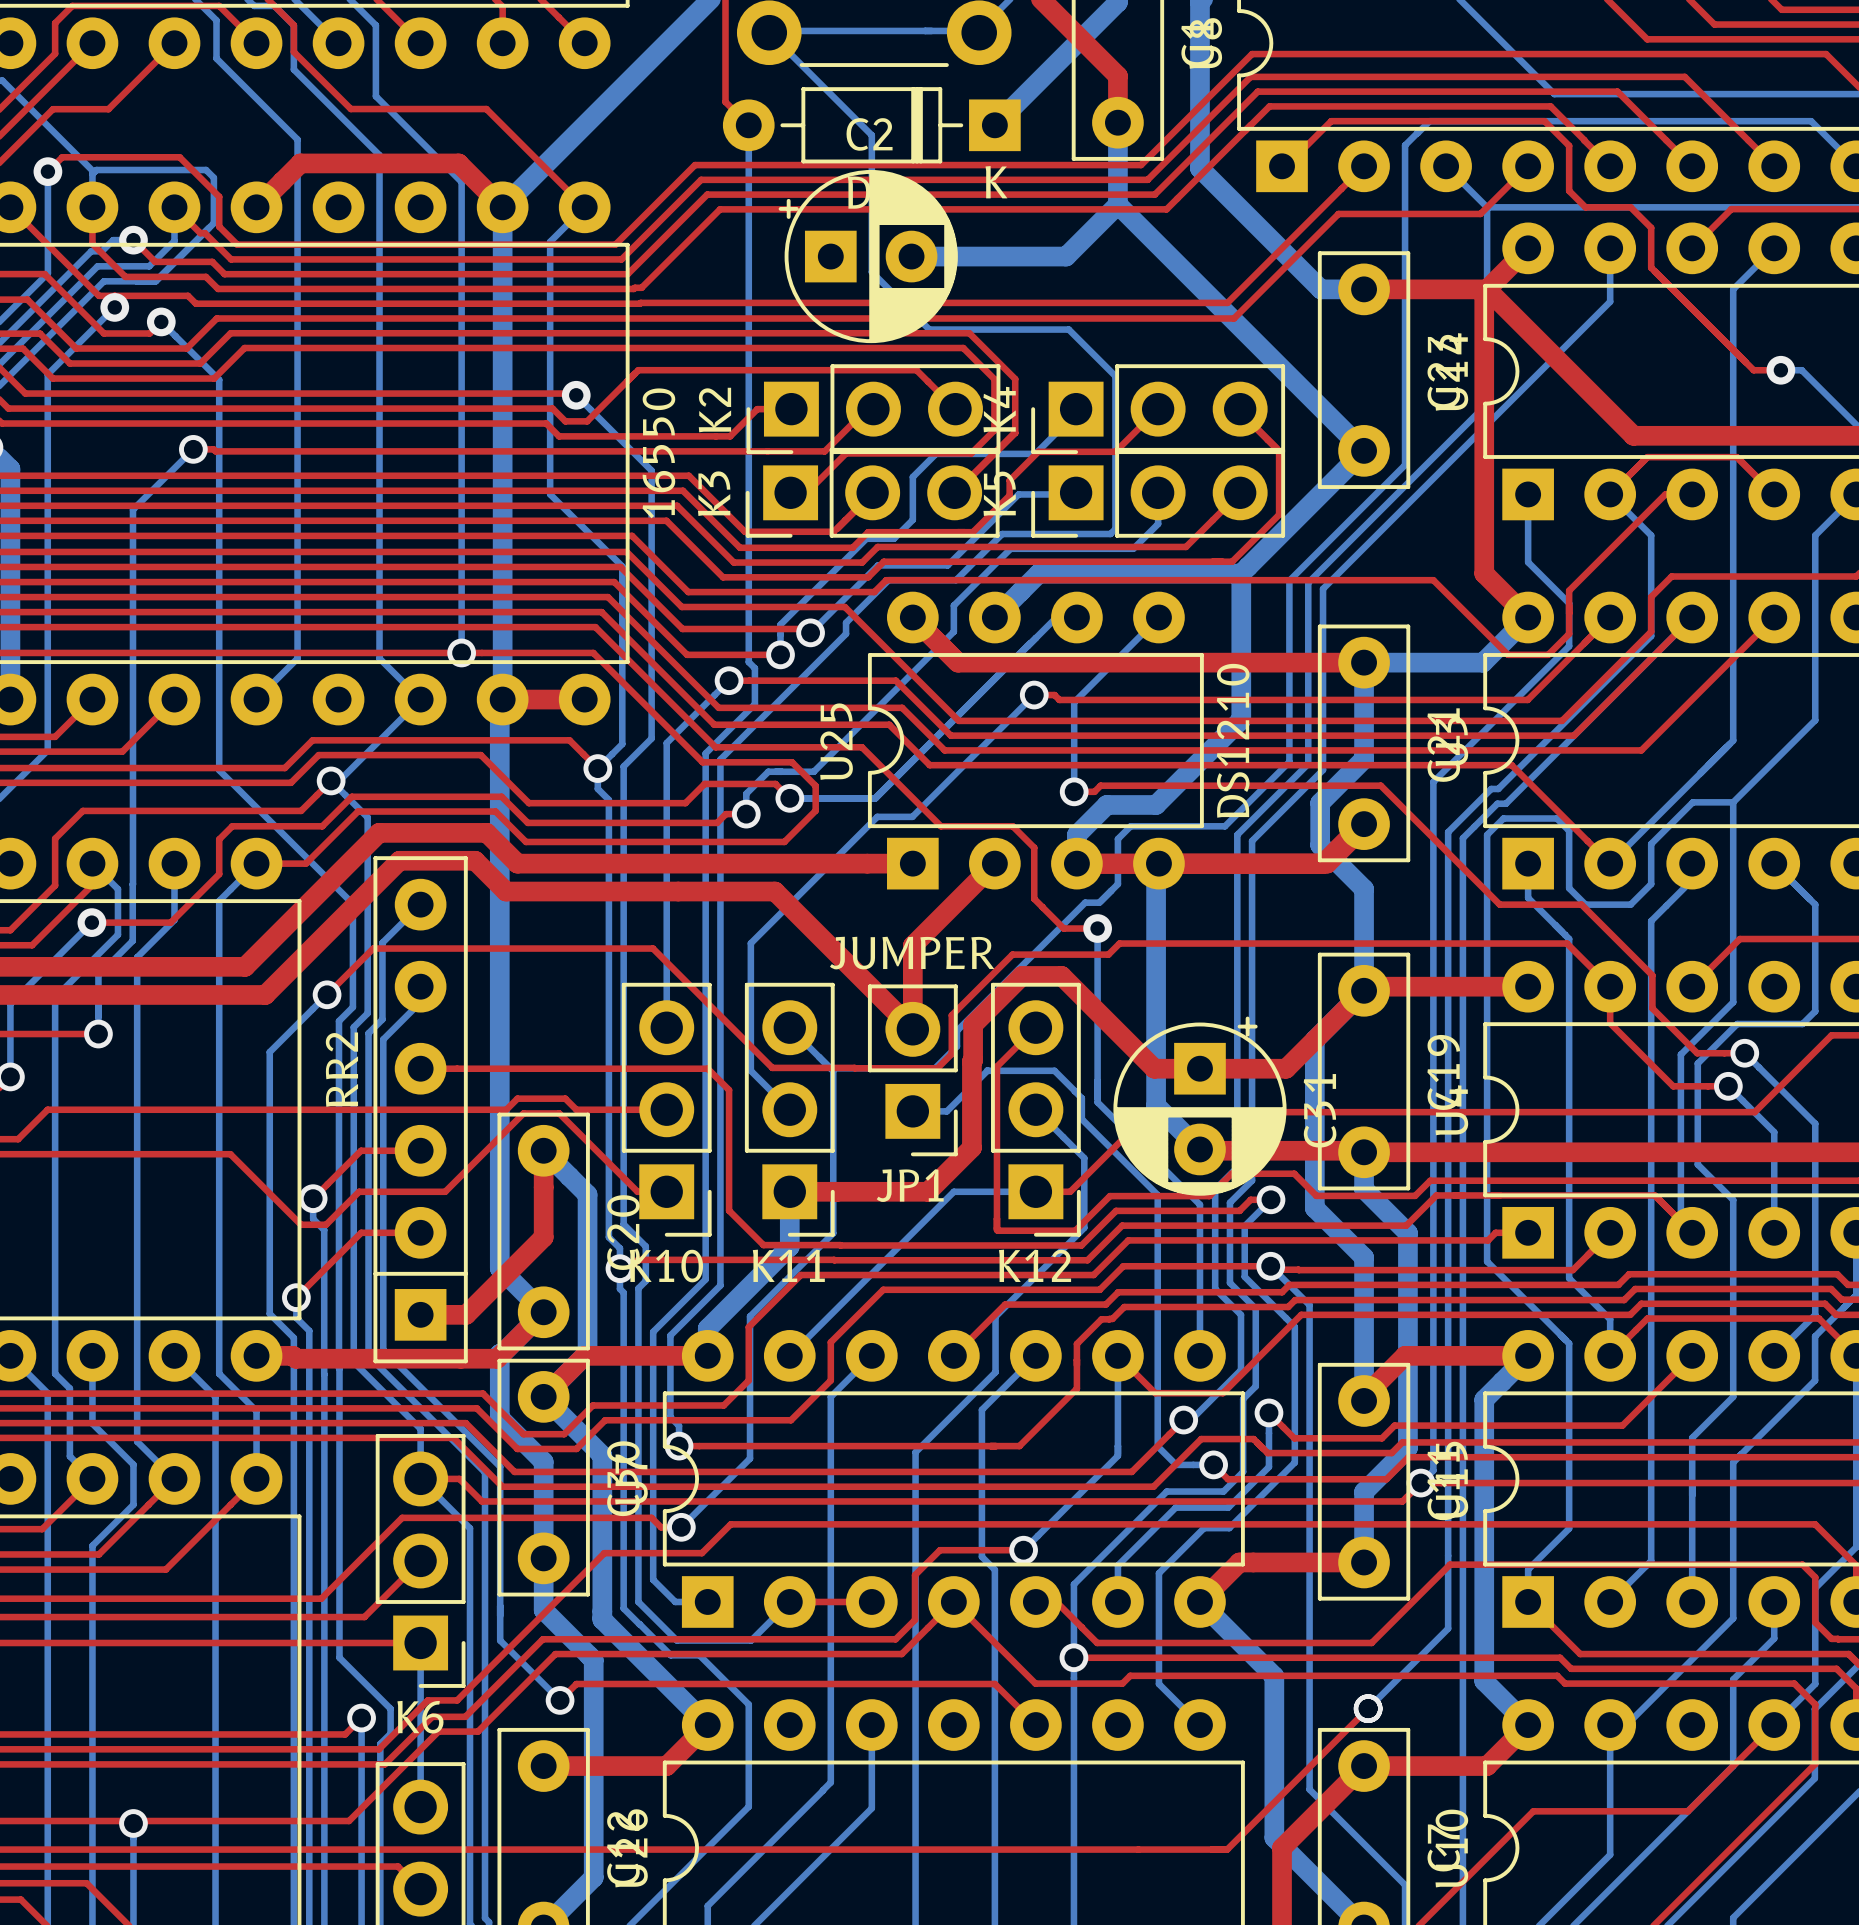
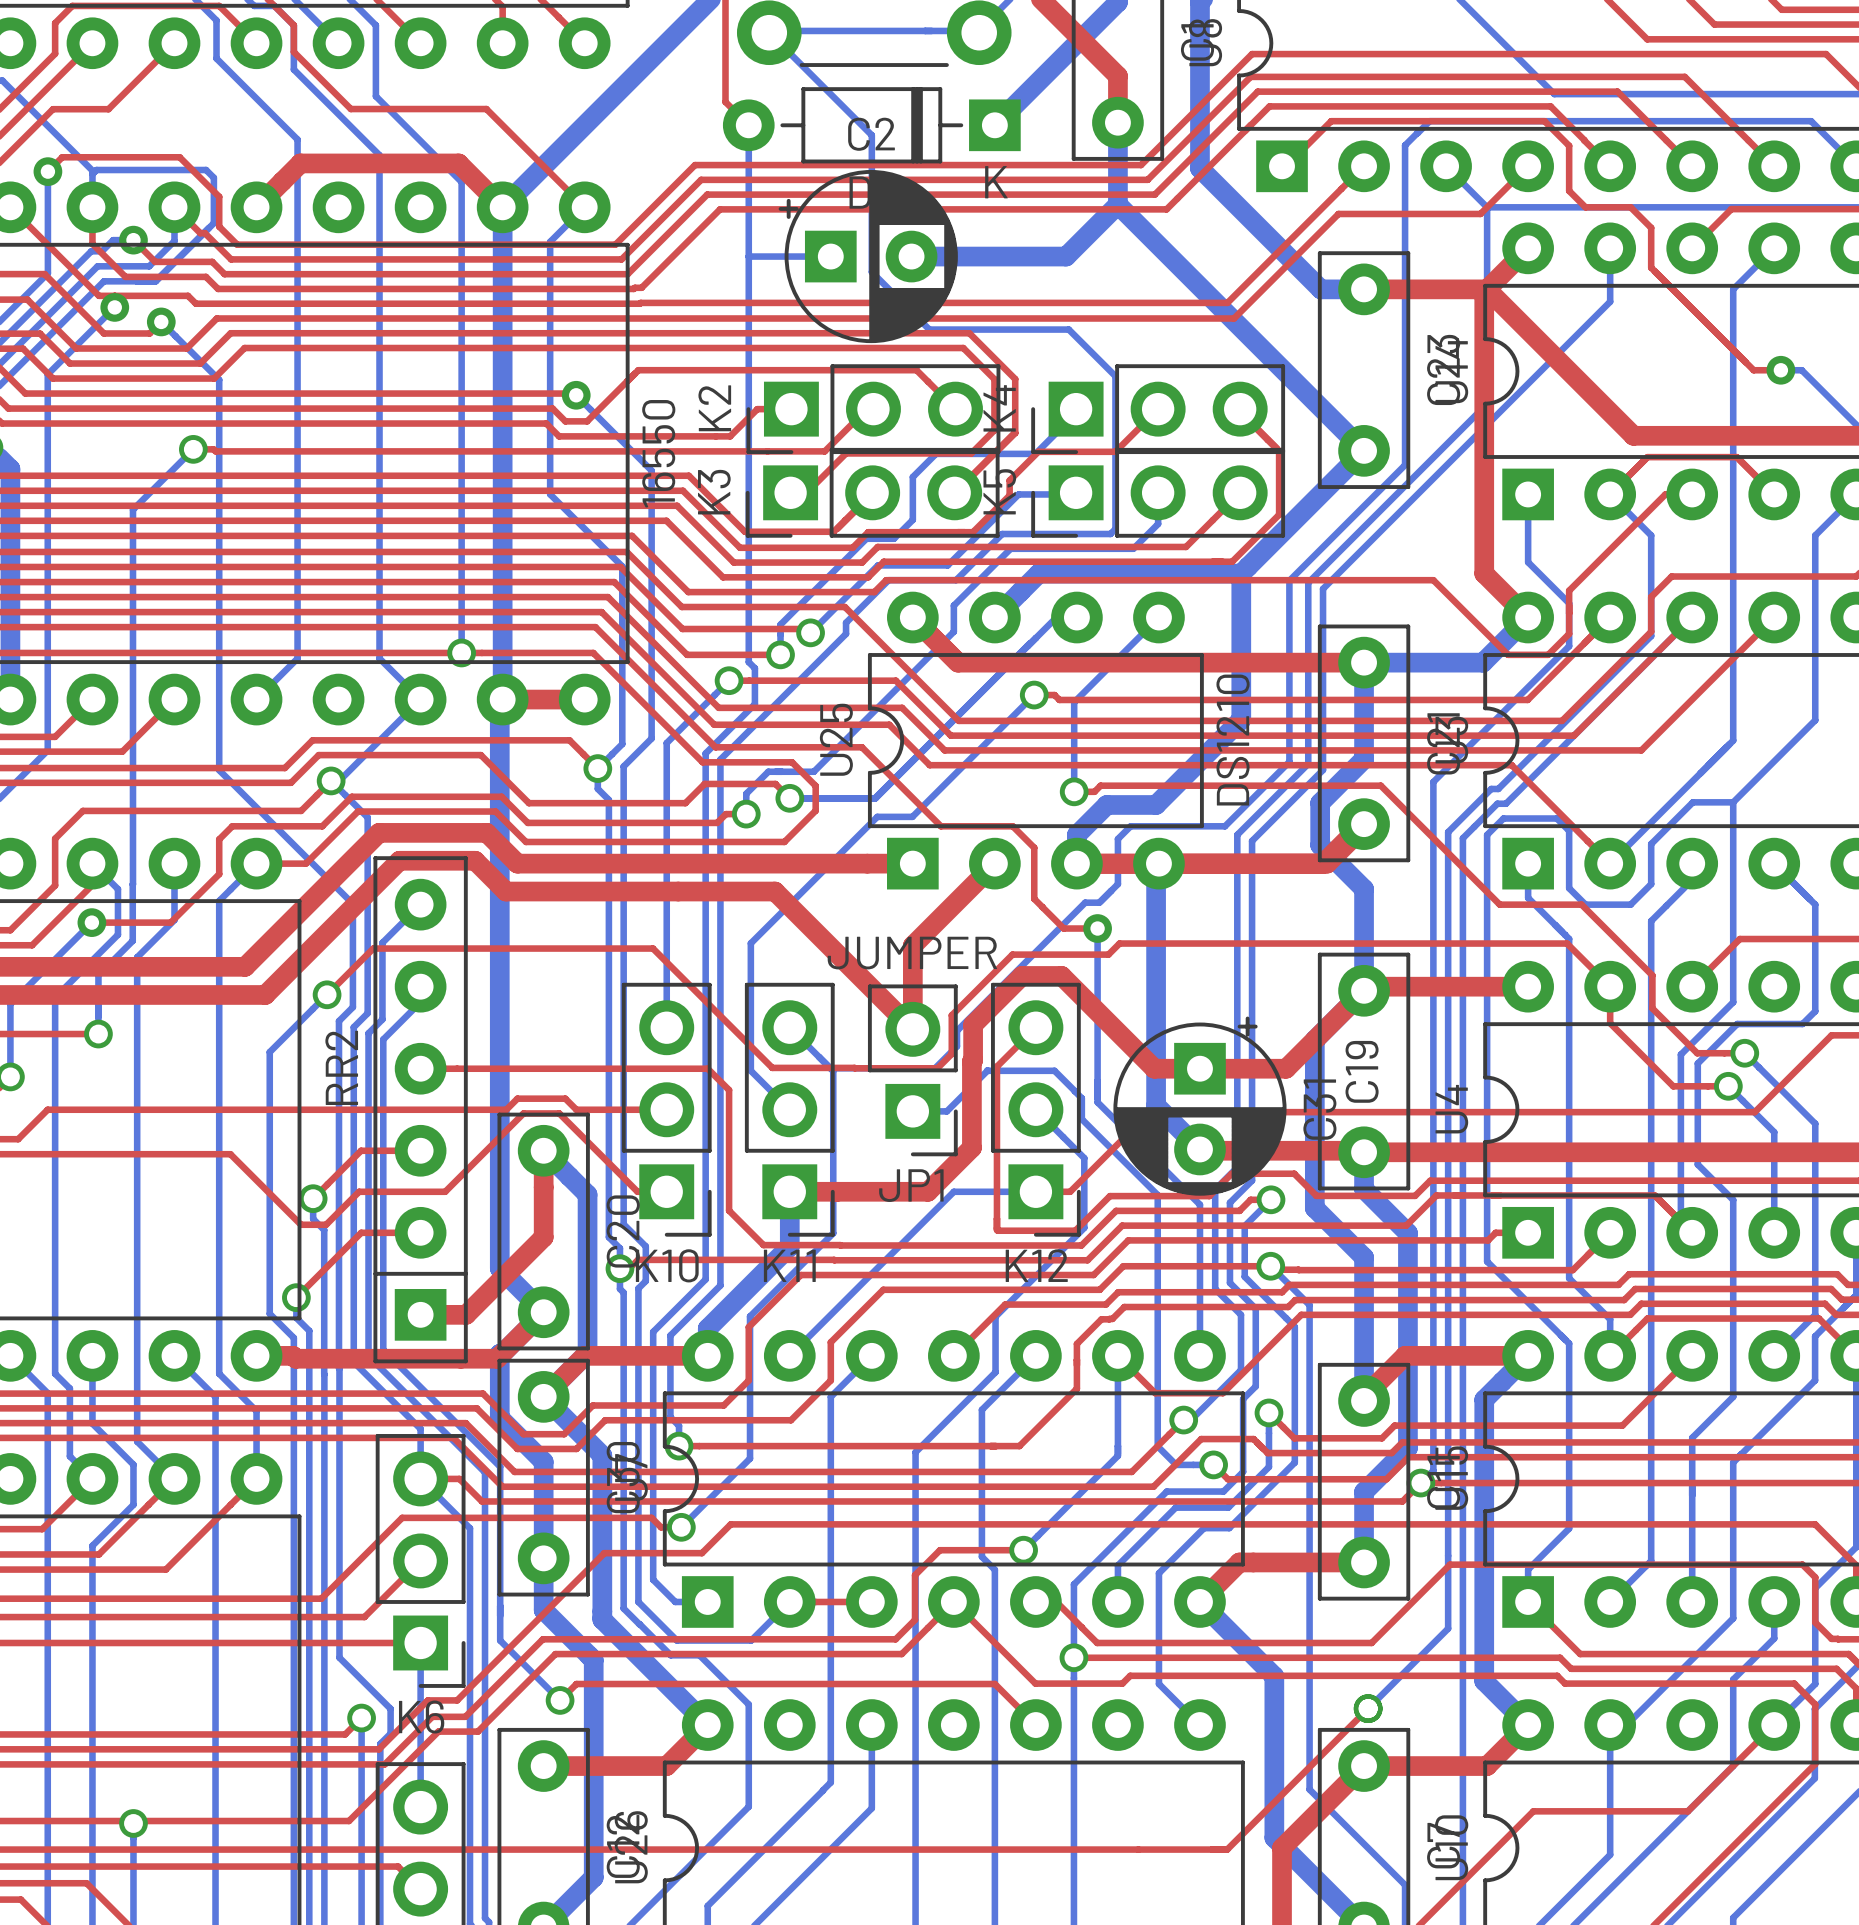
bottom track: none -> (748, 256) (830, 256)
C19 name position: C19 (1443, 1072) -> C19 (1362, 1071)

